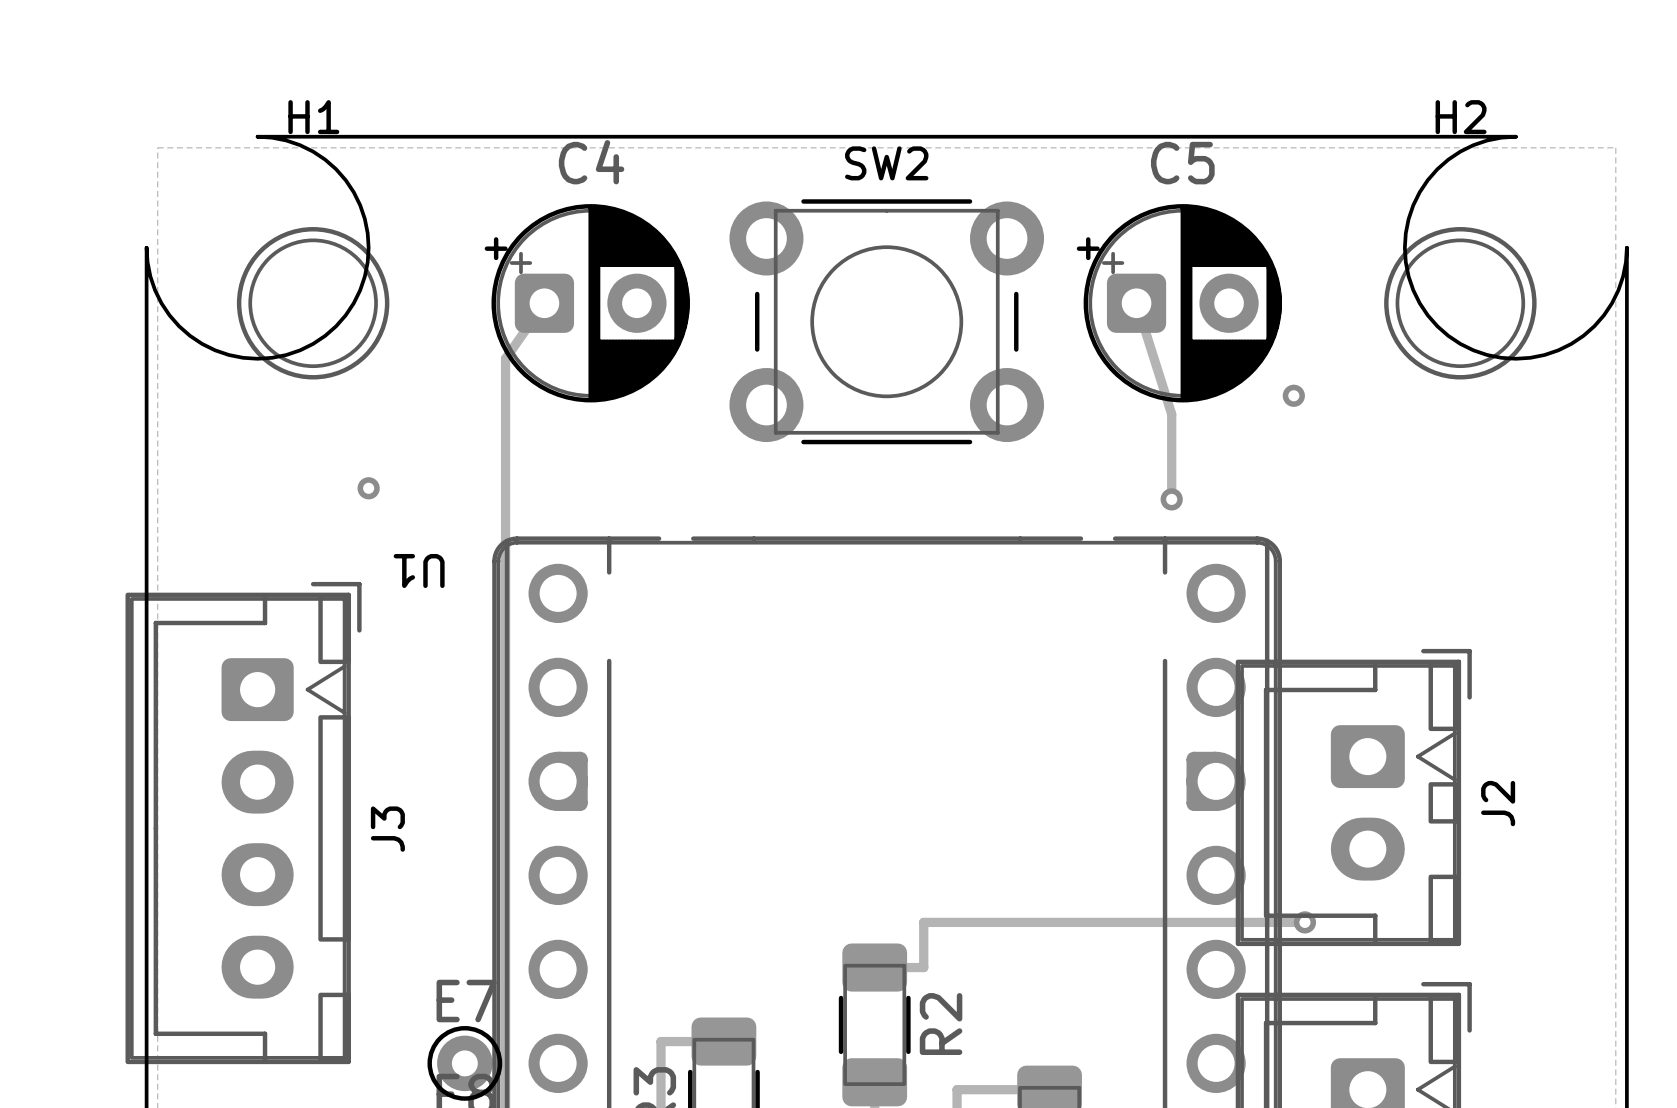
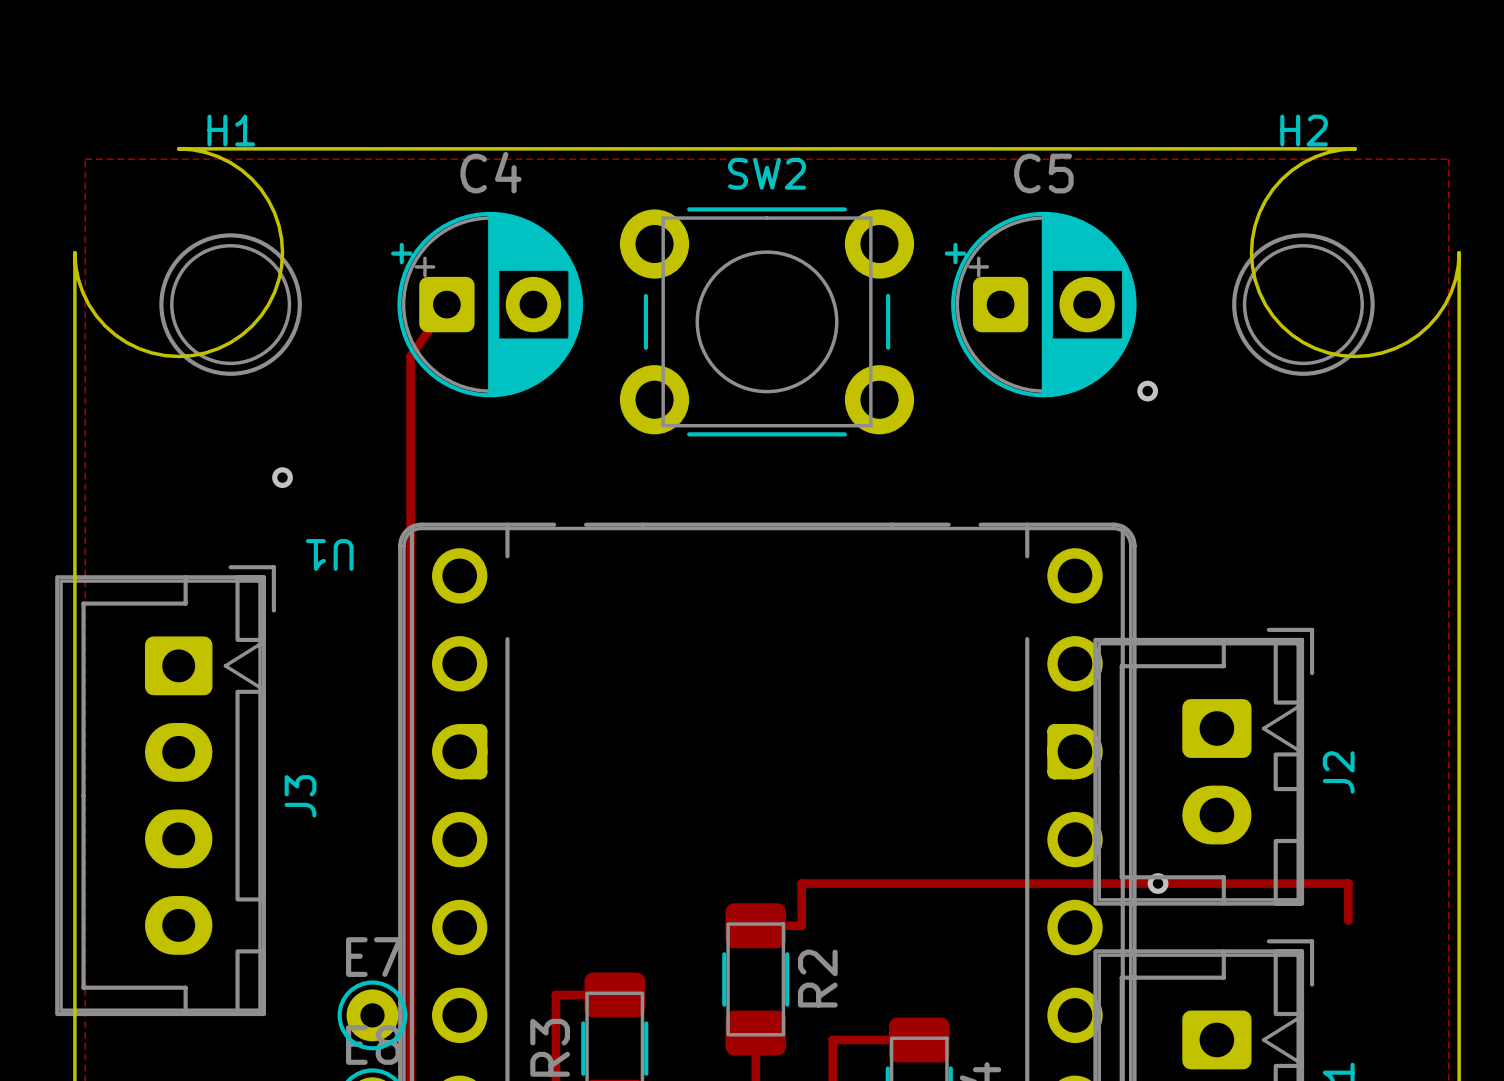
track: (1136, 303) (1171, 414) (1171, 499) -> none
via: (1171, 499) -> none
track: none -> (1158, 883) (1348, 883) (1348, 920)

